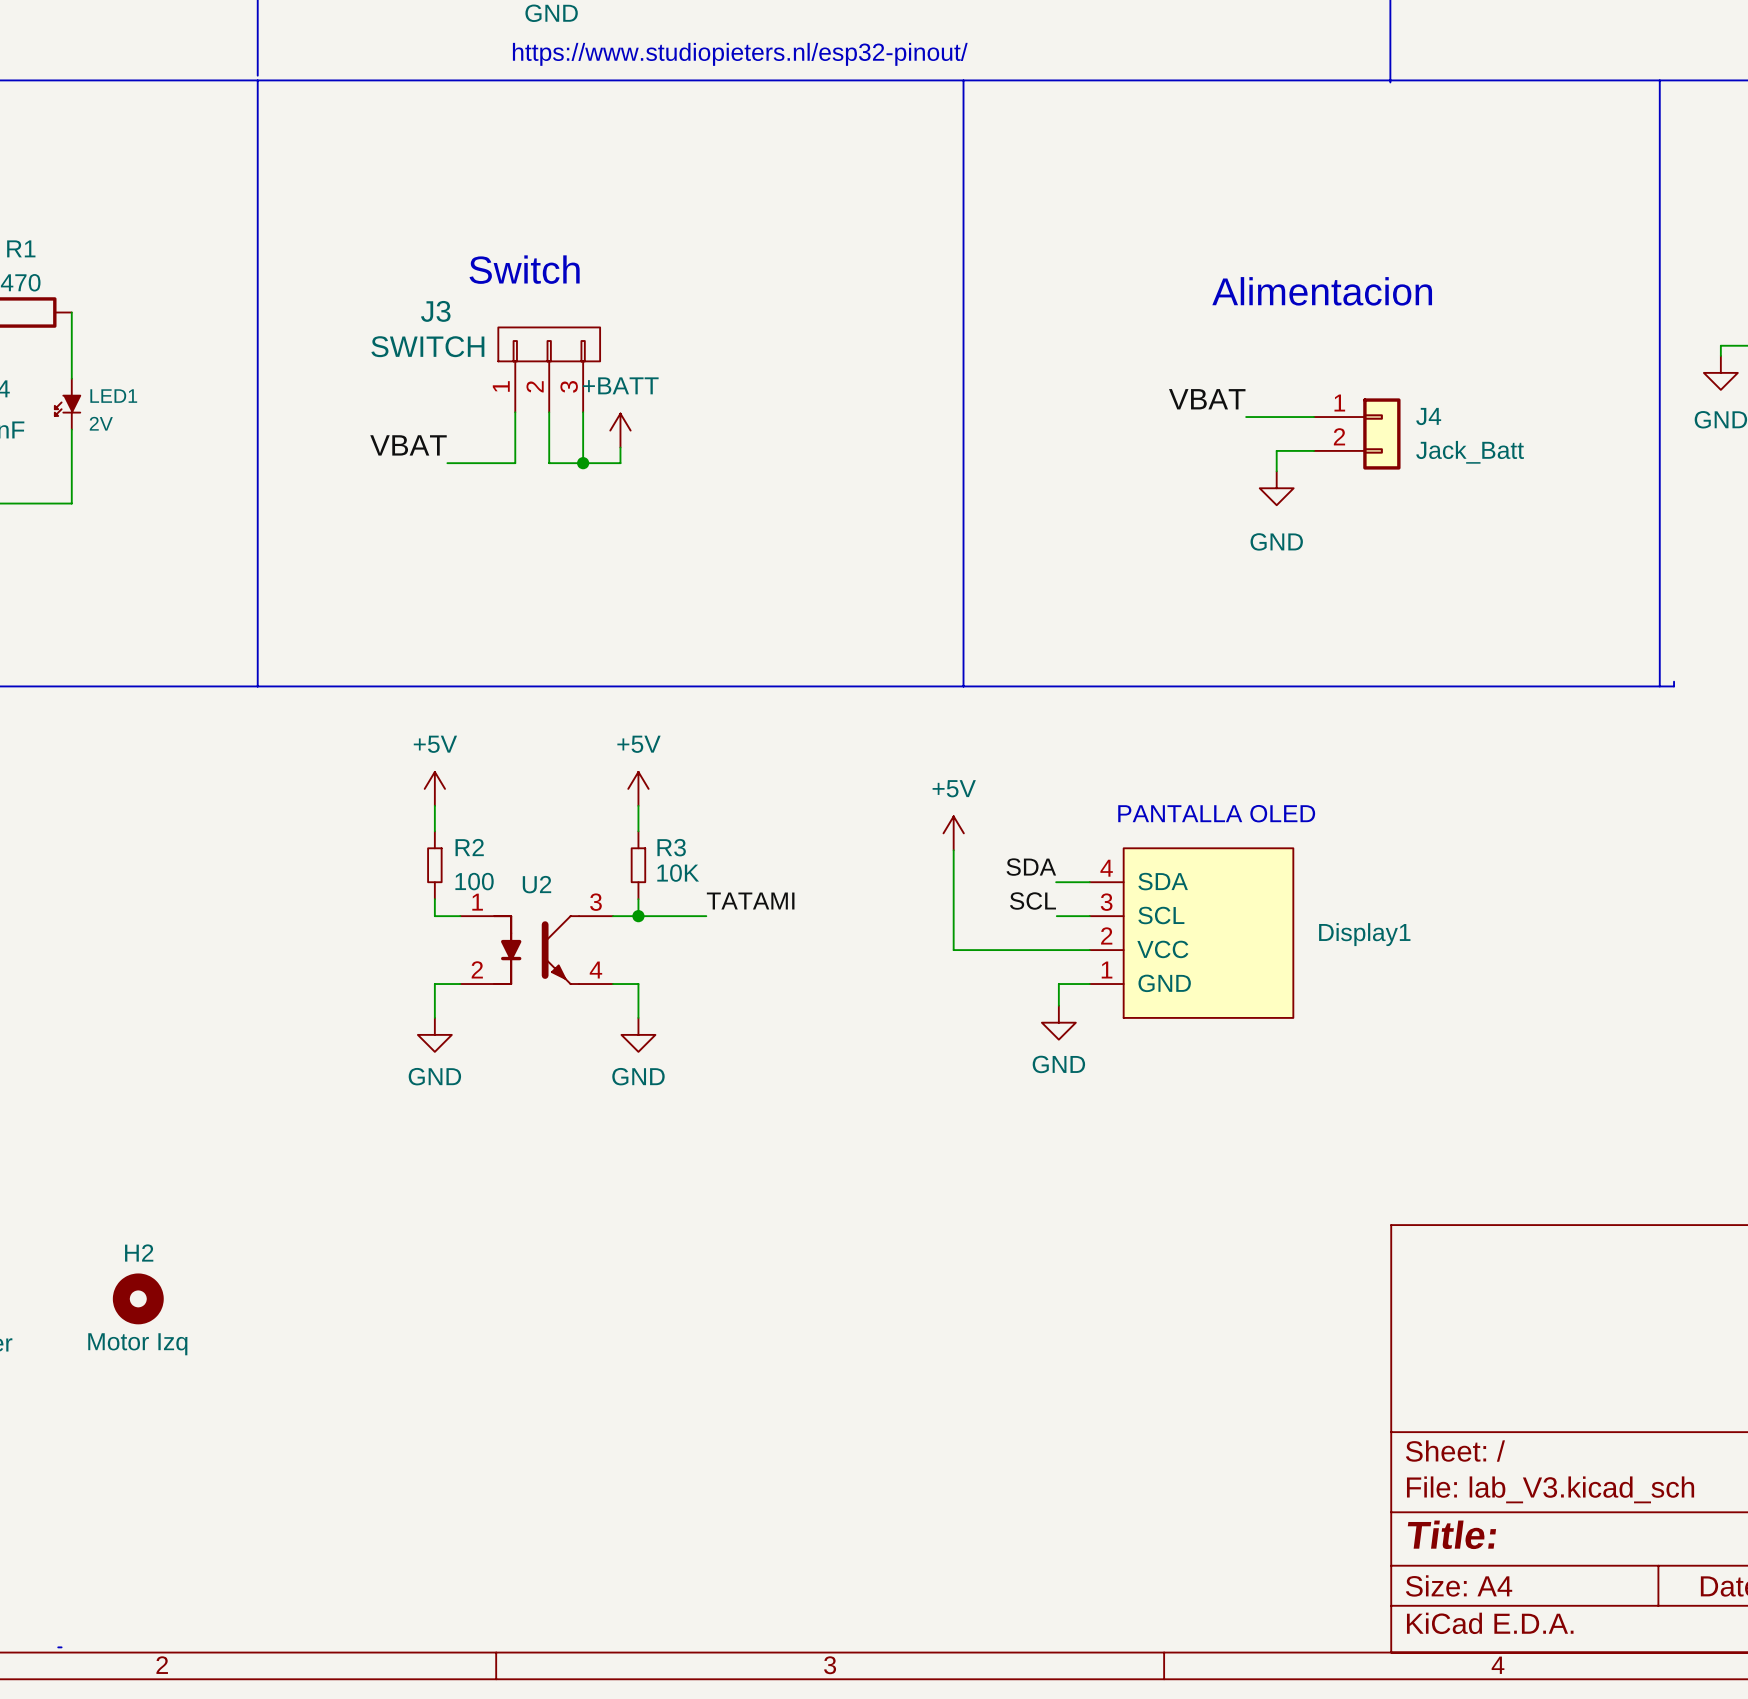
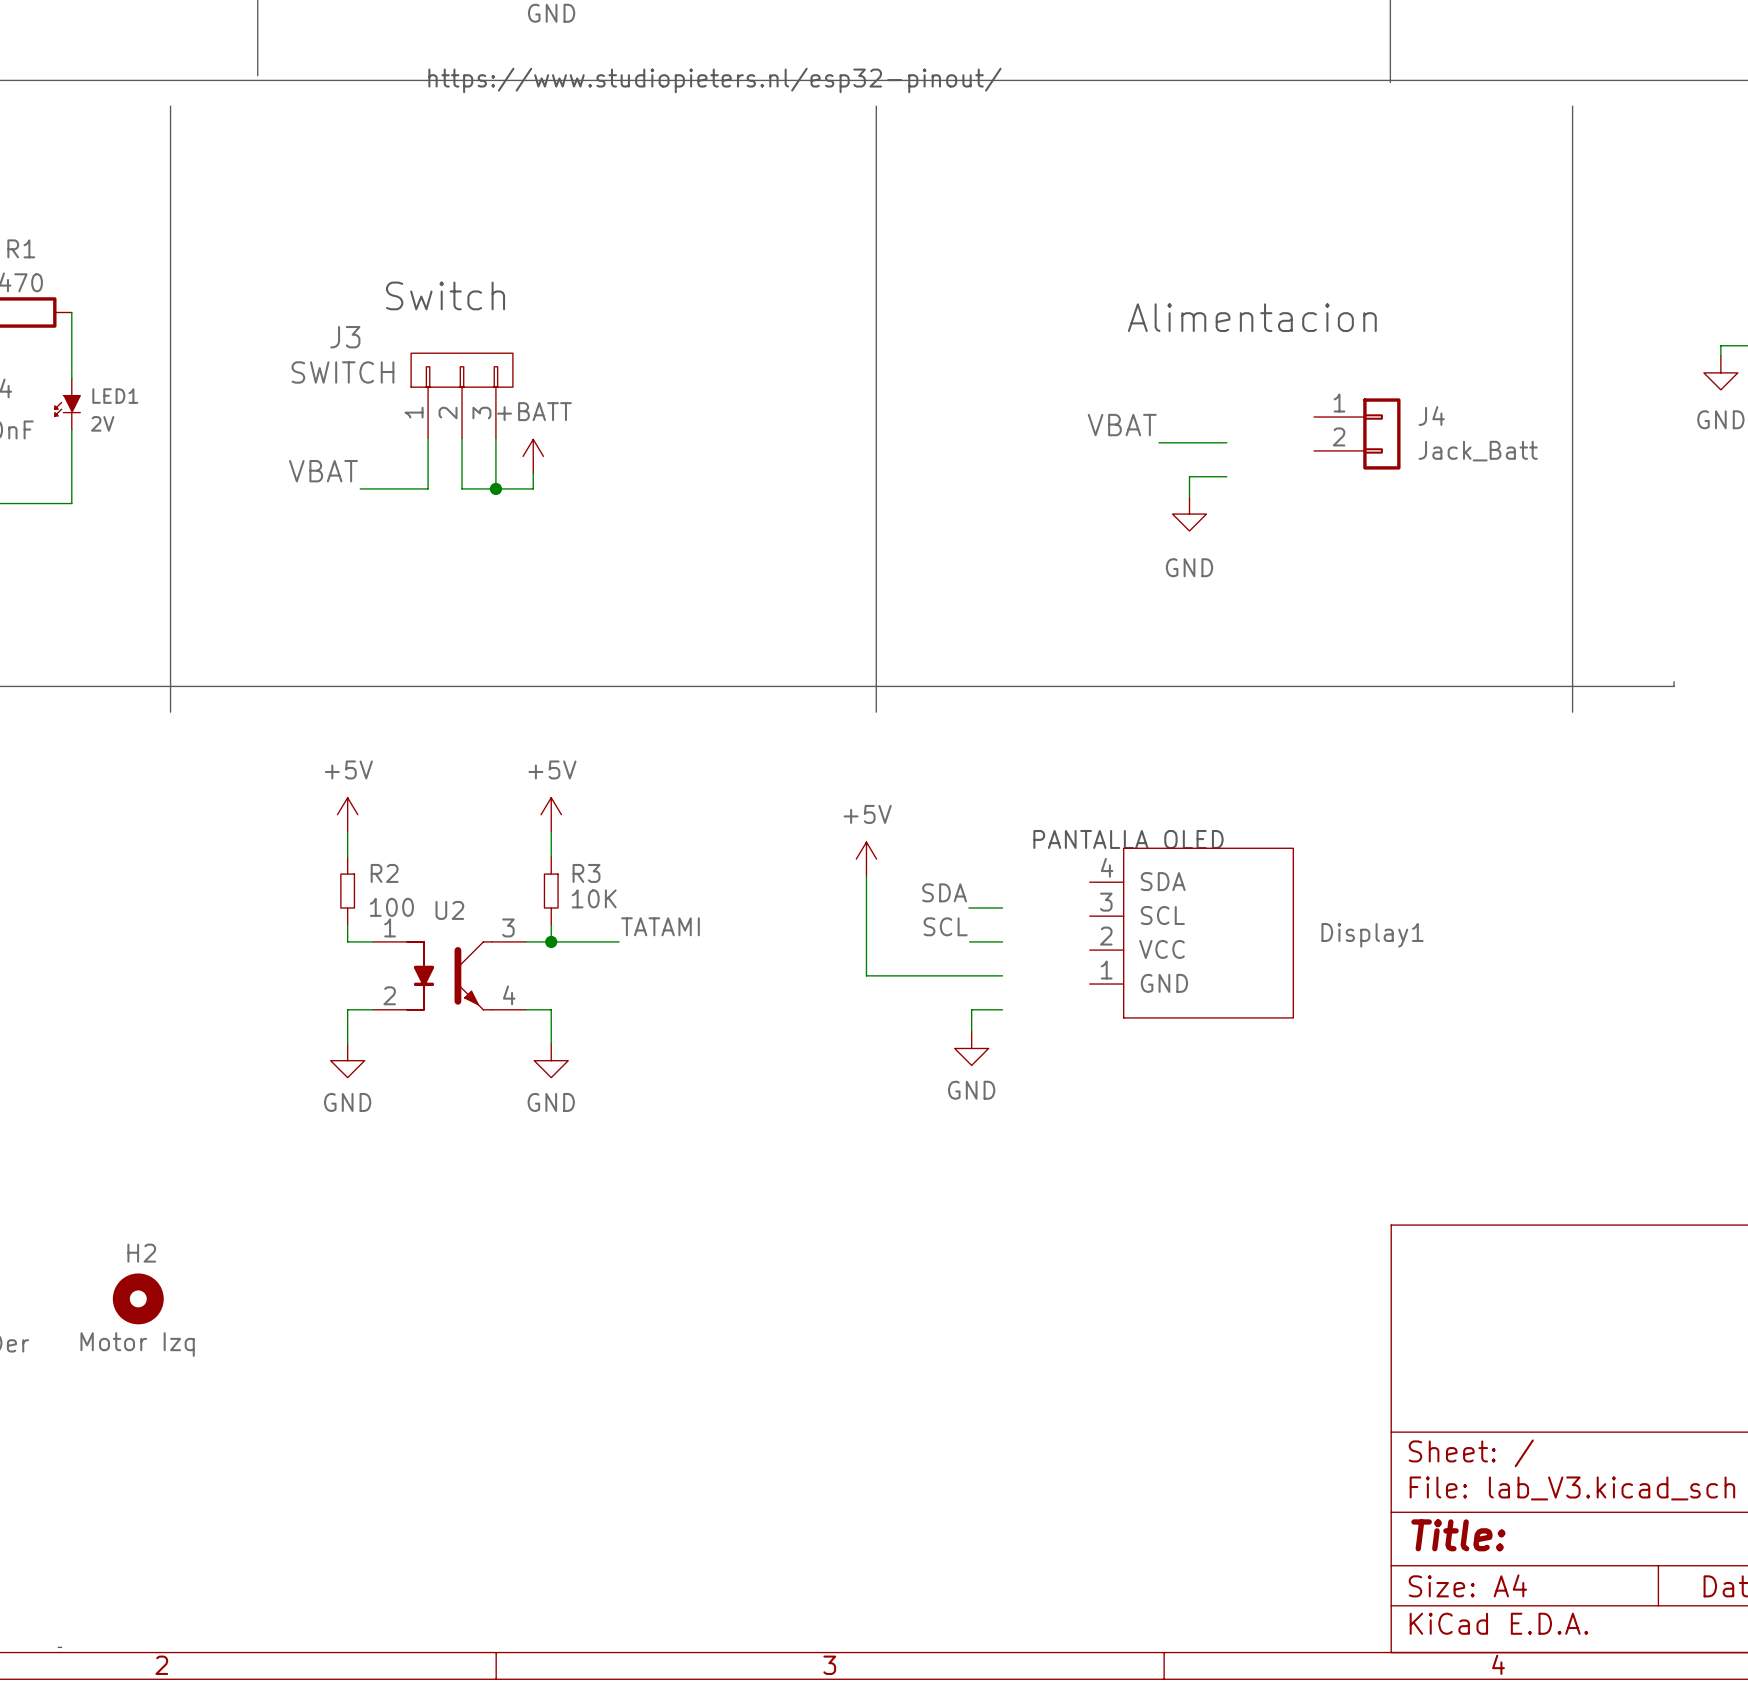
text position: https://www.studiopieters.nl/esp32-pinout/ (740, 54) -> https://www.studiopieters.nl/esp32-pinout/ (714, 80)
line: (257, 80) (257, 686) -> (170, 106) (170, 712)
line: (963, 80) (963, 686) -> (876, 106) (876, 712)
line: (1659, 80) (1659, 686) -> (1572, 106) (1572, 712)
text position: Switch (524, 269) -> Switch (445, 295)
text position: Alimentacion (1322, 291) -> Alimentacion (1252, 317)
J3 position: (549, 369) -> (462, 395)
label position: VBAT (1207, 399) -> VBAT (1122, 425)
wire: (515, 412) (515, 463) (447, 463) -> (428, 438) (428, 488) (360, 488)
wire: (549, 412) (549, 463) (620, 463) (620, 447) -> (462, 438) (462, 488) (533, 488) (533, 473)
wire: (583, 412) (583, 463) -> (495, 438) (495, 488)
wire: (1246, 417) (1314, 417) -> (1158, 442) (1226, 442)
power symbol position: +BATT (620, 430) -> +BATT (533, 456)
label position: VBAT (408, 445) -> VBAT (323, 471)
wire: (1314, 450) (1276, 450) (1276, 471) -> (1226, 476) (1189, 476) (1189, 497)
junction: (583, 463) -> none
junction: none -> (495, 488)
power symbol position: GND (1276, 488) -> GND (1189, 514)
power symbol: +5V (434, 788) -> none
power symbol: +5V (638, 788) -> none
wire: (434, 805) (434, 831) -> (347, 831) (347, 857)
wire: (638, 805) (638, 831) -> (551, 831) (551, 857)
text position: PANTALLA OLED (1216, 813) -> PANTALLA OLED (1128, 839)
power symbol: none -> +5V (347, 814)
power symbol: none -> +5V (551, 814)
power symbol position: +5V (953, 833) -> +5V (866, 859)
wire: (953, 850) (953, 950) (1089, 950) -> (866, 876) (866, 975) (1002, 975)
R2 position: (434, 865) -> (347, 891)
R3 position: (638, 865) -> (551, 891)
label position: SDA (1031, 867) -> SDA (944, 892)
wire: (1056, 882) (1089, 882) -> (968, 908) (1002, 908)
wire: (434, 899) (434, 916) (460, 916) -> (347, 924) (347, 941) (373, 941)
wire: (638, 899) (638, 916) -> (551, 924) (551, 941)
label position: TATAMI (750, 901) -> TATAMI (660, 926)
label position: SCL (1032, 901) -> SCL (945, 926)
wire: (613, 916) (706, 916) -> (525, 941) (619, 941)
junction: (638, 916) -> none
wire: (1056, 916) (1089, 916) -> (969, 941) (1002, 941)
junction: none -> (551, 941)
U2 position: (536, 950) -> (449, 975)
wire: (460, 984) (434, 984) (434, 1017) -> (373, 1009) (347, 1009) (347, 1043)
wire: (613, 984) (638, 984) (638, 1017) -> (525, 1009) (551, 1009) (551, 1043)
wire: (1089, 984) (1058, 984) (1058, 1005) -> (1002, 1009) (971, 1009) (971, 1031)
power symbol position: GND (1058, 1022) -> GND (971, 1048)
power symbol: GND (434, 1034) -> none
power symbol: GND (638, 1034) -> none
power symbol: none -> GND (347, 1060)
power symbol: none -> GND (551, 1060)

